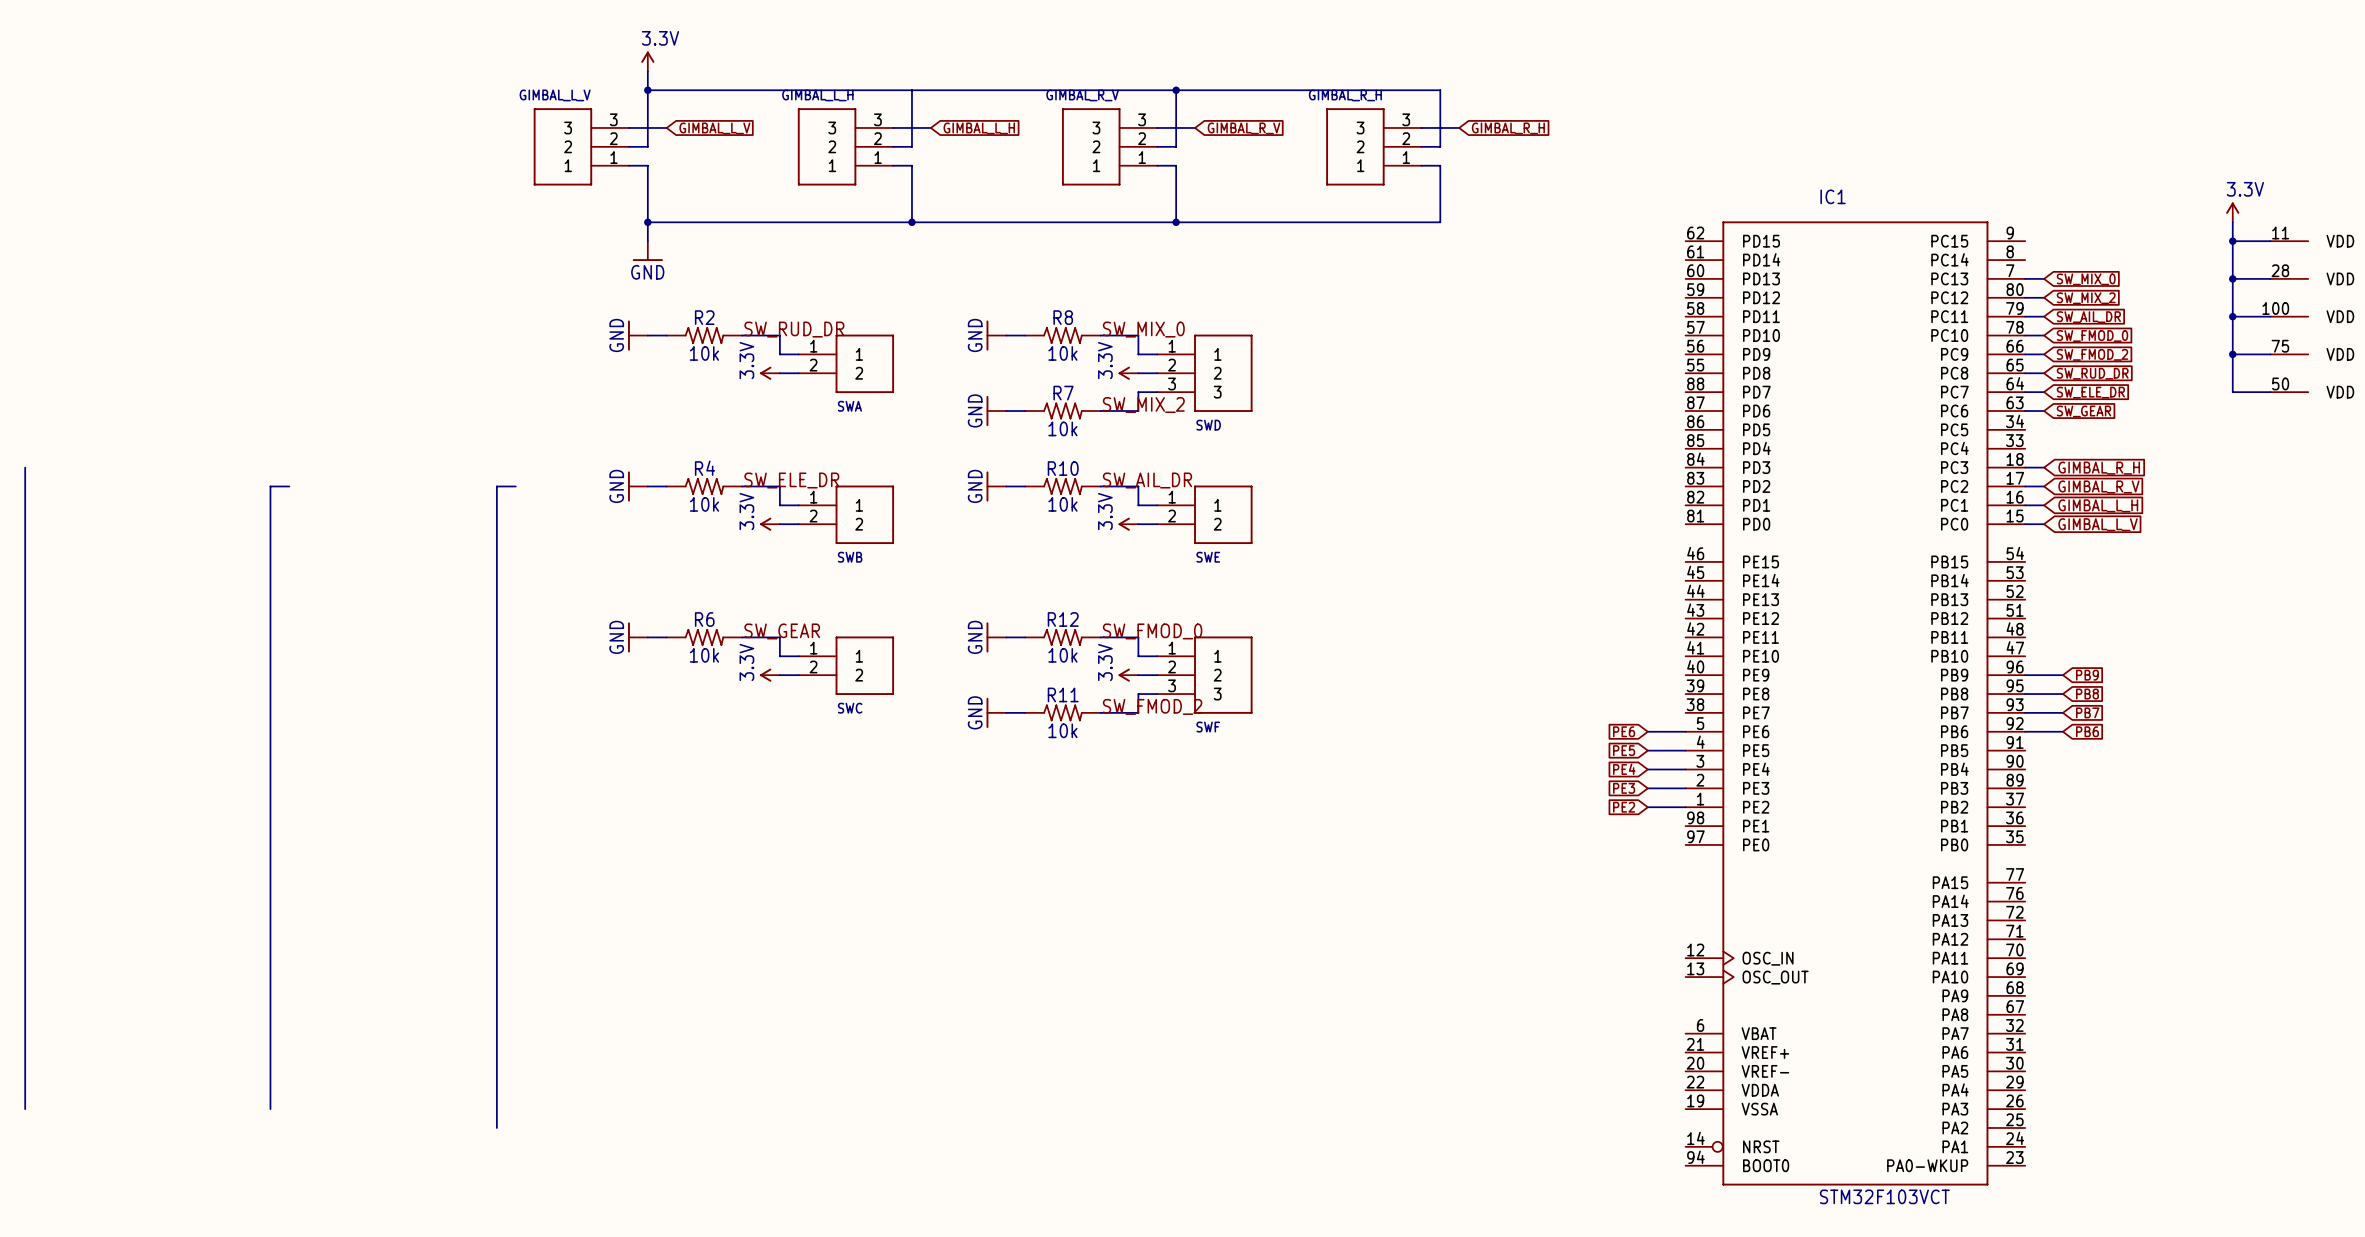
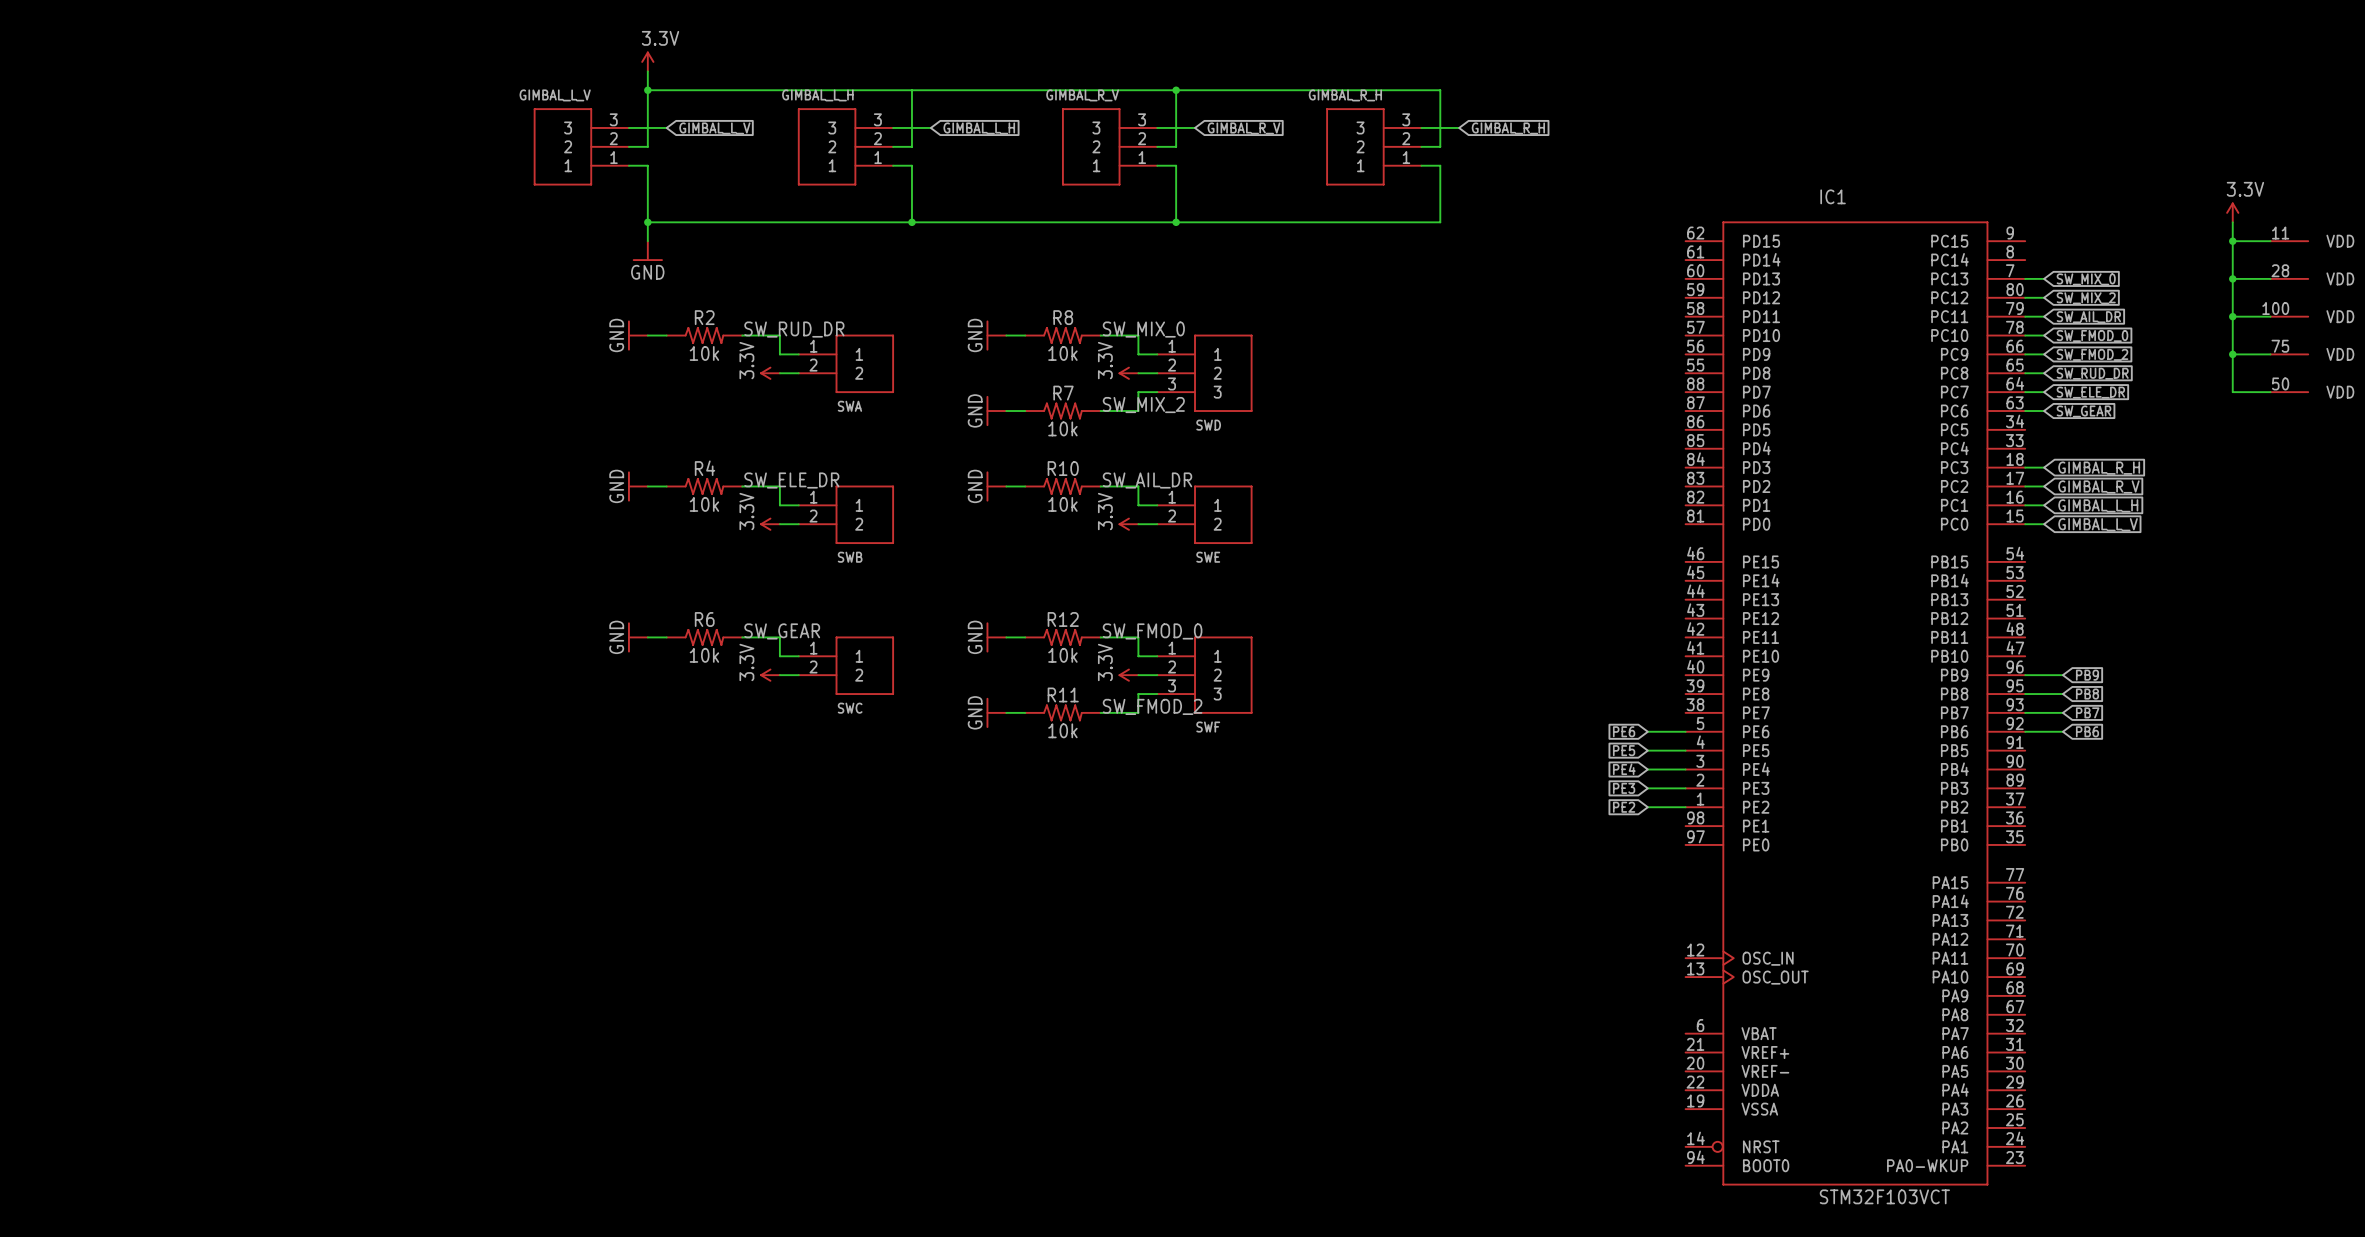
wire: (25, 467) (25, 1109) -> none
wire: (289, 486) (270, 486) (270, 1109) -> none
wire: (515, 486) (496, 486) (496, 1127) -> none

